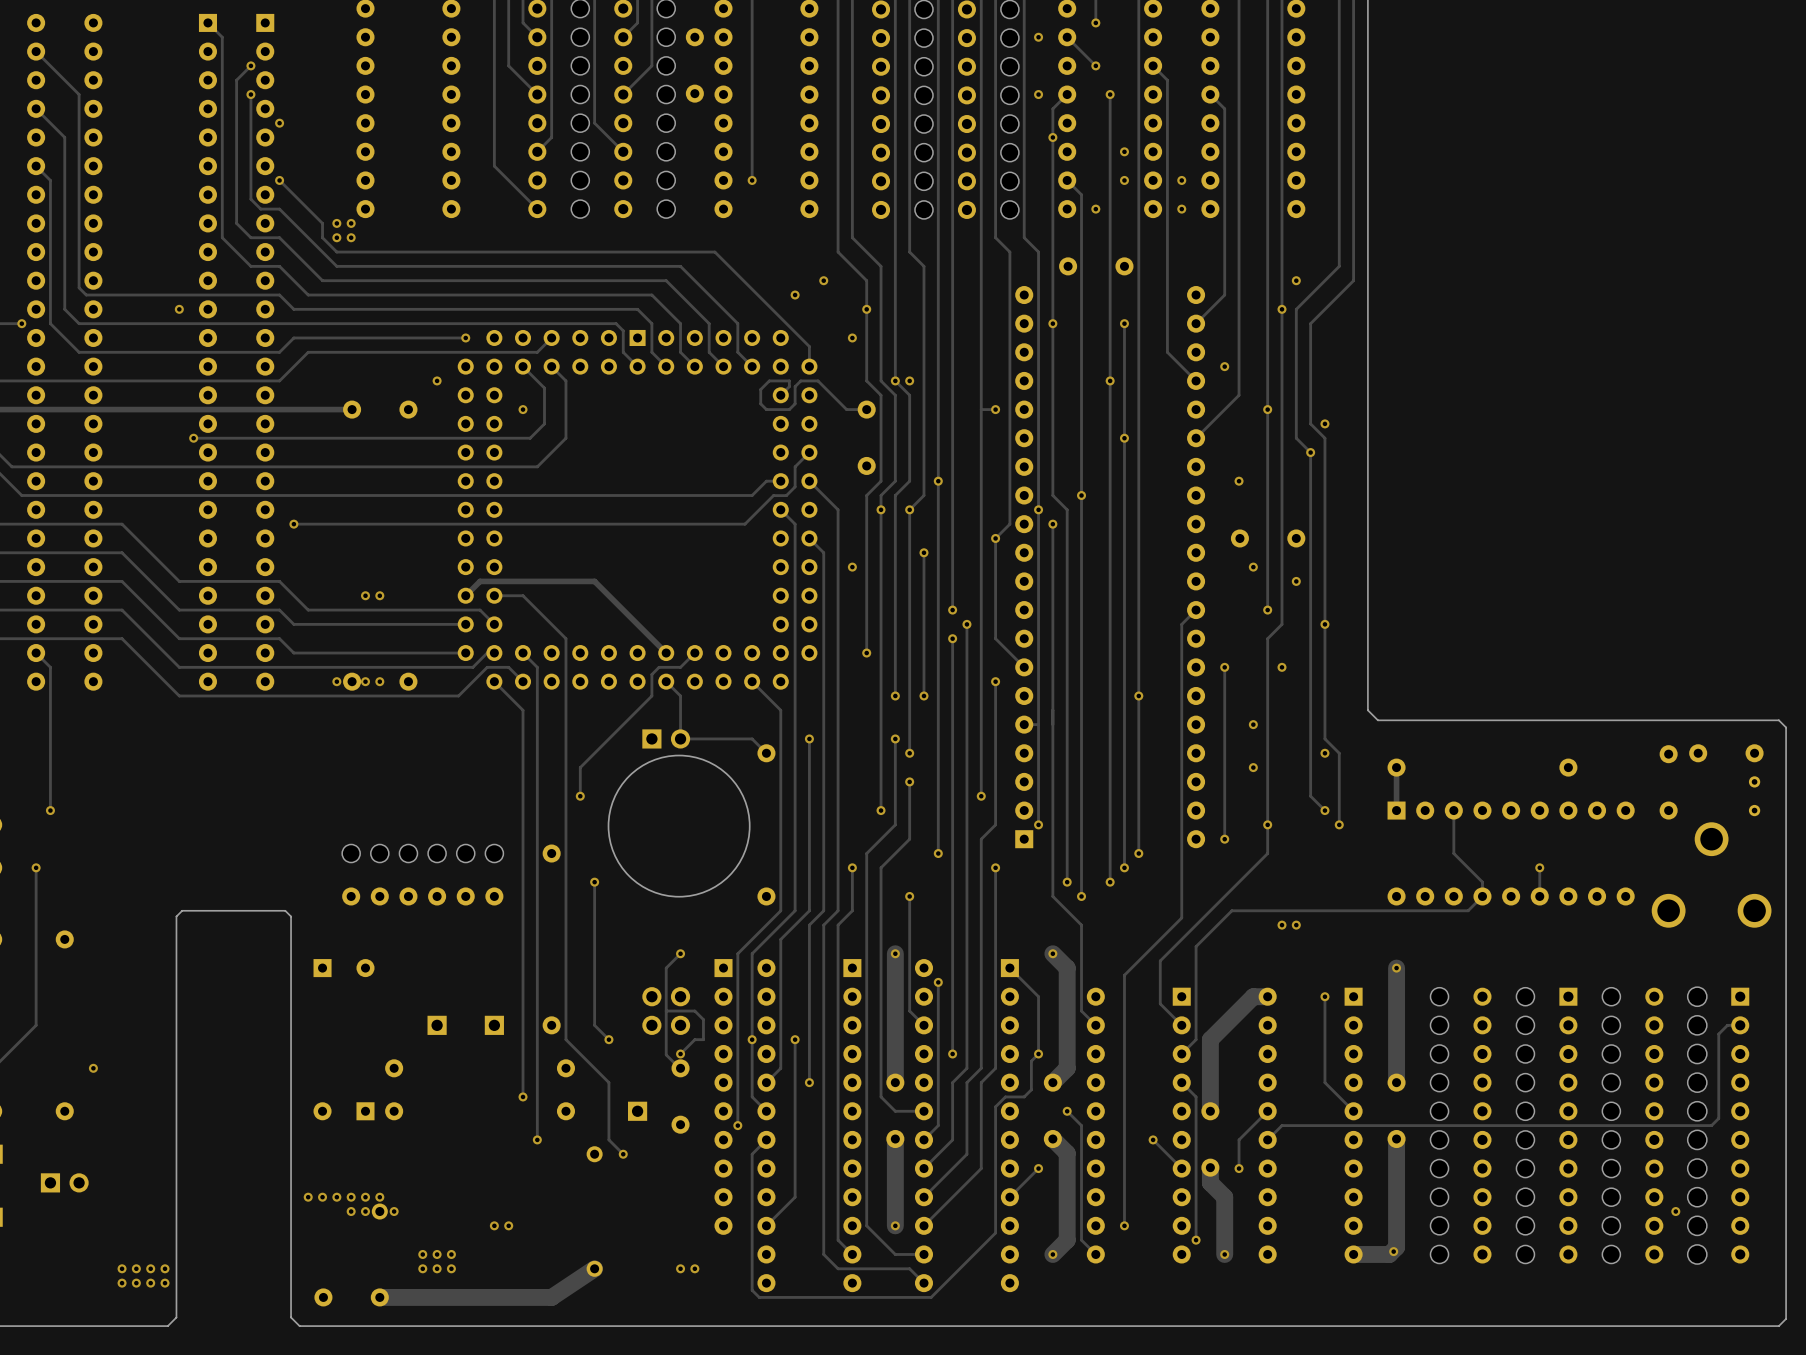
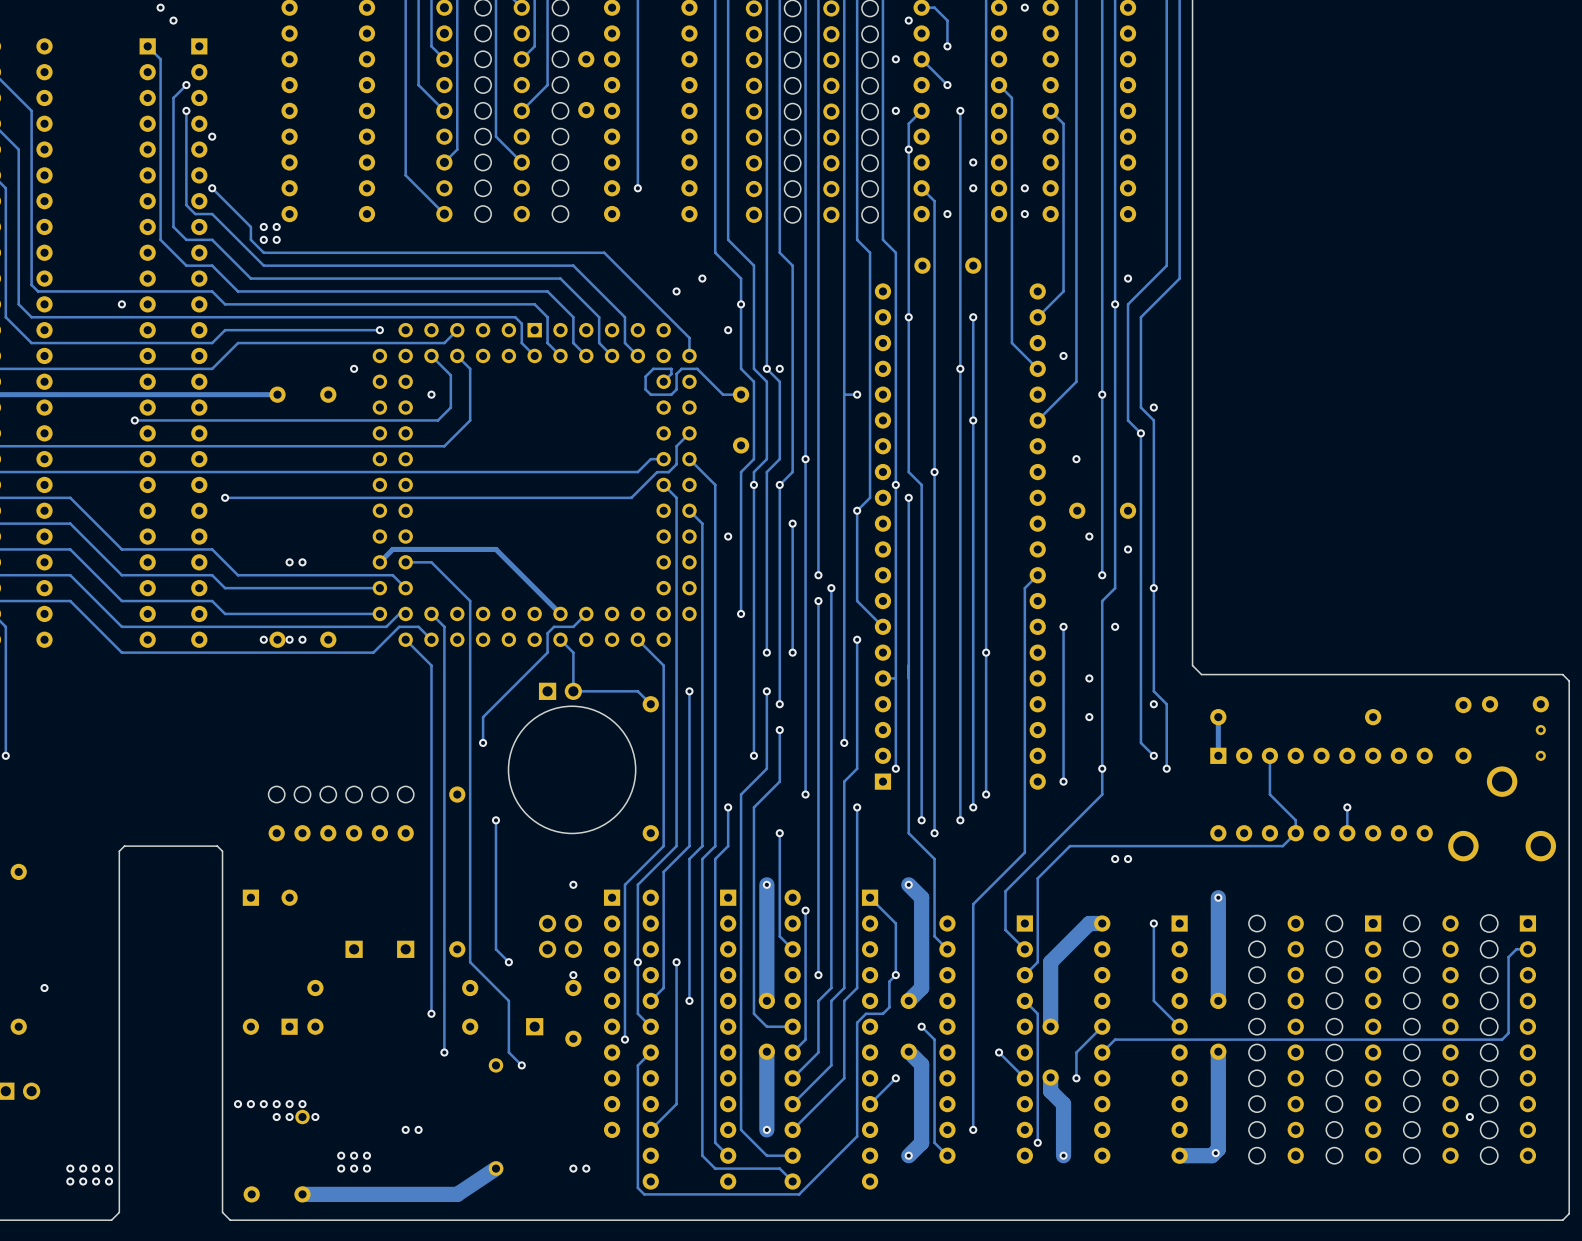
track: (680, 953) (666, 968) (666, 1054) (680, 1069) -> none
track: (666, 1011) (694, 1011) (703, 1019) (703, 1039) (694, 1039) (680, 1053) -> none

